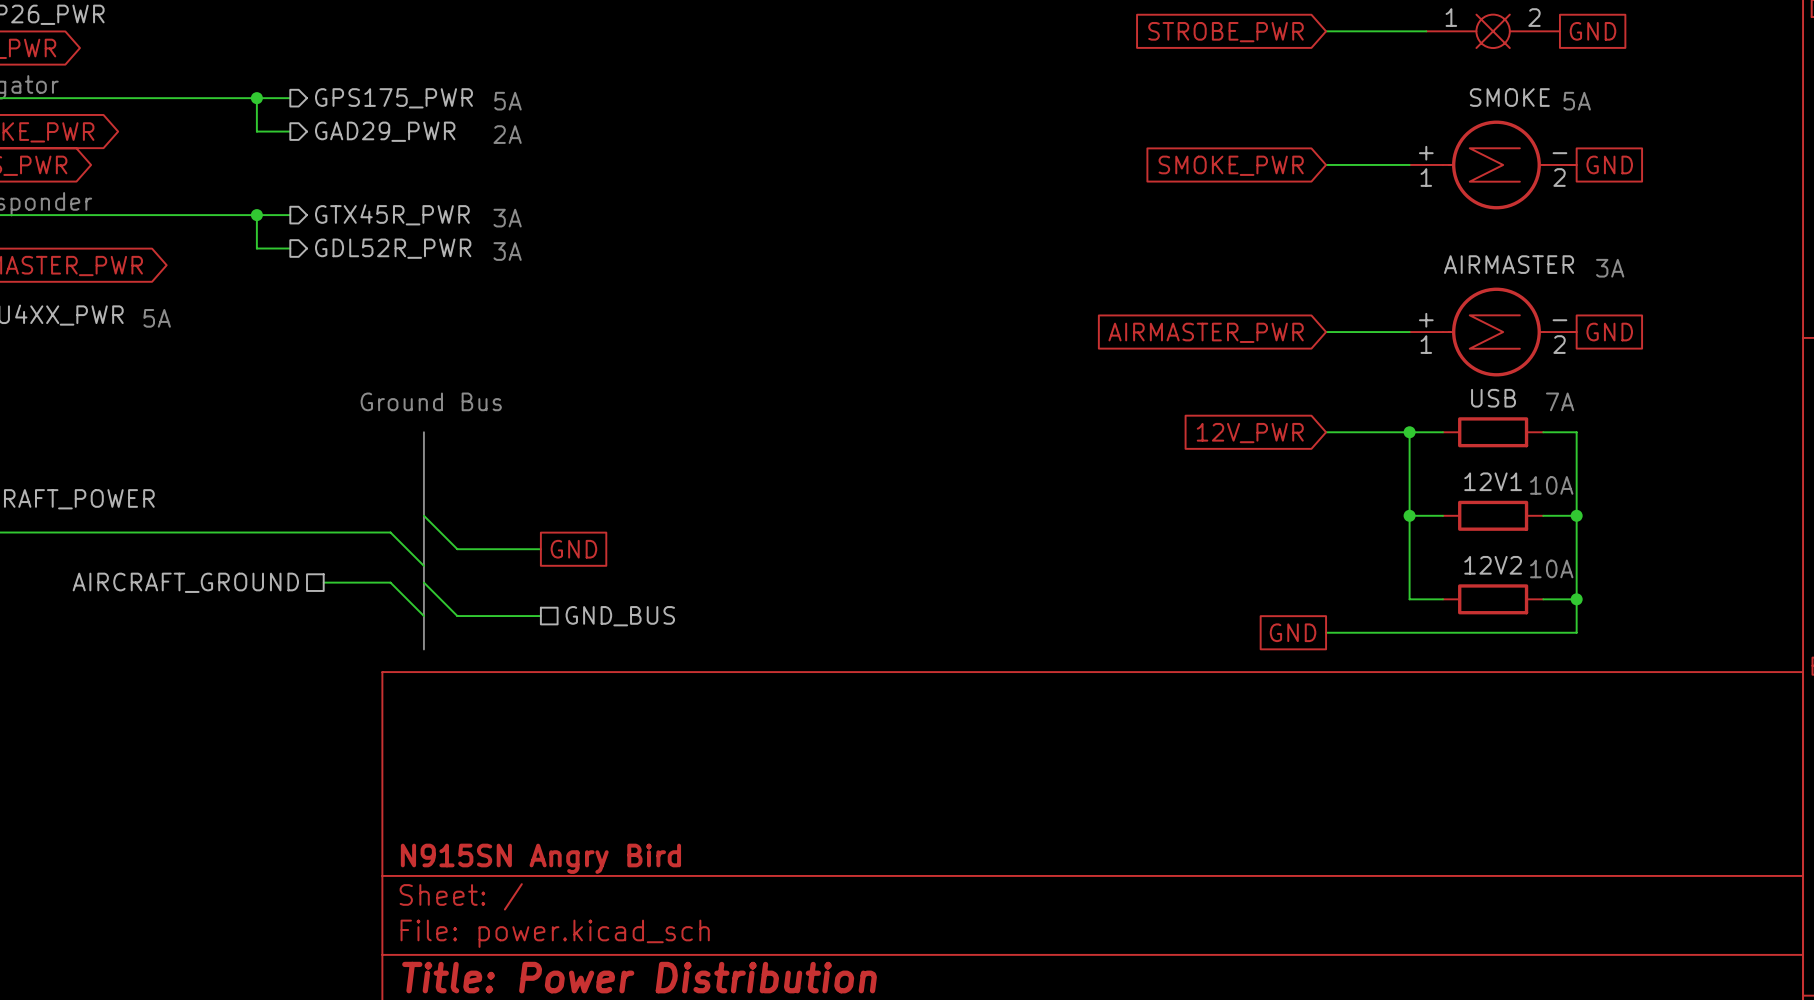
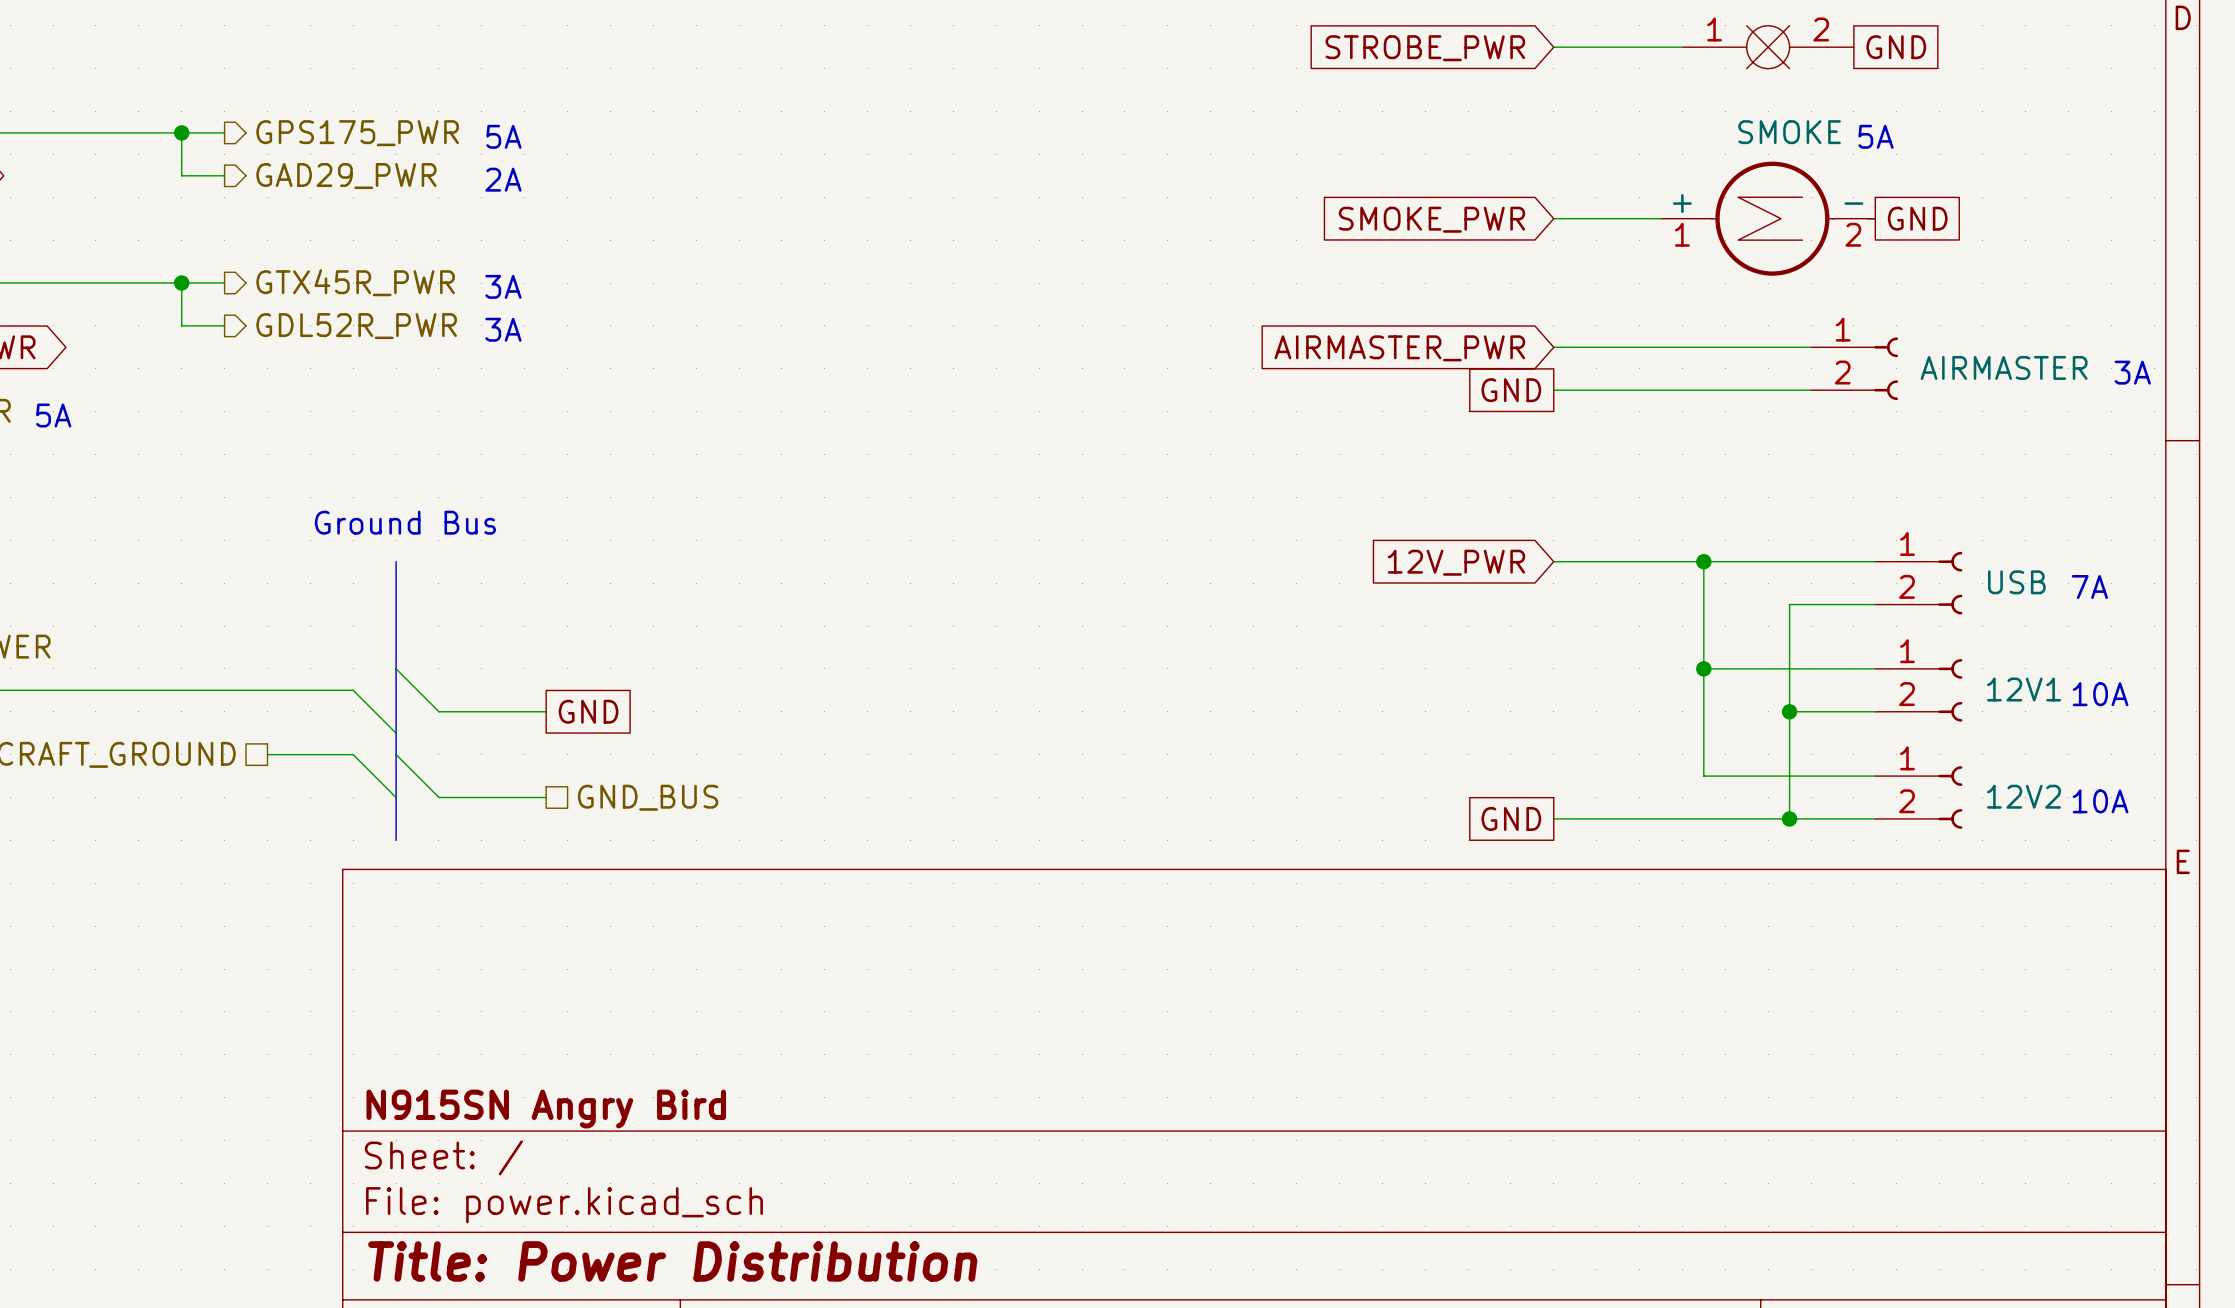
wire: none -> (1553, 347) (1811, 347)
text position: 3A (1610, 268) -> 3A (2132, 372)
AIRMASTER: none -> (1854, 368)
wire: none -> (1553, 390) (1811, 390)
global label position: AIRMASTER_PWR (1206, 332) -> AIRMASTER_PWR (1399, 348)
wire: (1326, 332) (1409, 332) -> none
AIRMASTER: (1493, 332) -> none
global label rotation: 0° (1609, 332) -> 180° (1511, 390)
global label position: GND (1609, 332) -> GND (1511, 390)
text position: 7A (1560, 401) -> 7A (2089, 587)
wire: (1409, 432) (1409, 599) (1443, 599) -> none
junction position: (1409, 432) -> (1703, 561)
USB: (1493, 432) -> none
wire: none -> (1832, 561) (1703, 561) (1703, 776) (1832, 776)
wire: (1576, 432) (1576, 632) -> none
USB: none -> (1918, 583)
wire: none -> (1875, 604) (1789, 604) (1789, 818)
12V1 name position: 12V1 (1493, 481) -> 12V1 (2024, 689)
text: 10A (1551, 485) -> none
12V1 symbol: [1443, 500, 1544, 531] -> [1875, 659, 1963, 722]
wire: (1409, 515) (1443, 515) -> (1832, 668) (1703, 668)
junction position: (1409, 515) -> (1703, 668)
junction: (1576, 515) -> none
text: none -> 10A (2100, 694)
wire: none -> (1789, 711) (1875, 711)
junction: none -> (1789, 711)
12V2 name position: 12V2 (1493, 565) -> 12V2 (2024, 796)
text: 10A (1551, 568) -> none
12V2 symbol: [1443, 584, 1544, 615] -> [1875, 766, 1963, 829]
junction: (1576, 599) -> none
text: none -> 10A (2100, 801)
junction: none -> (1789, 818)

